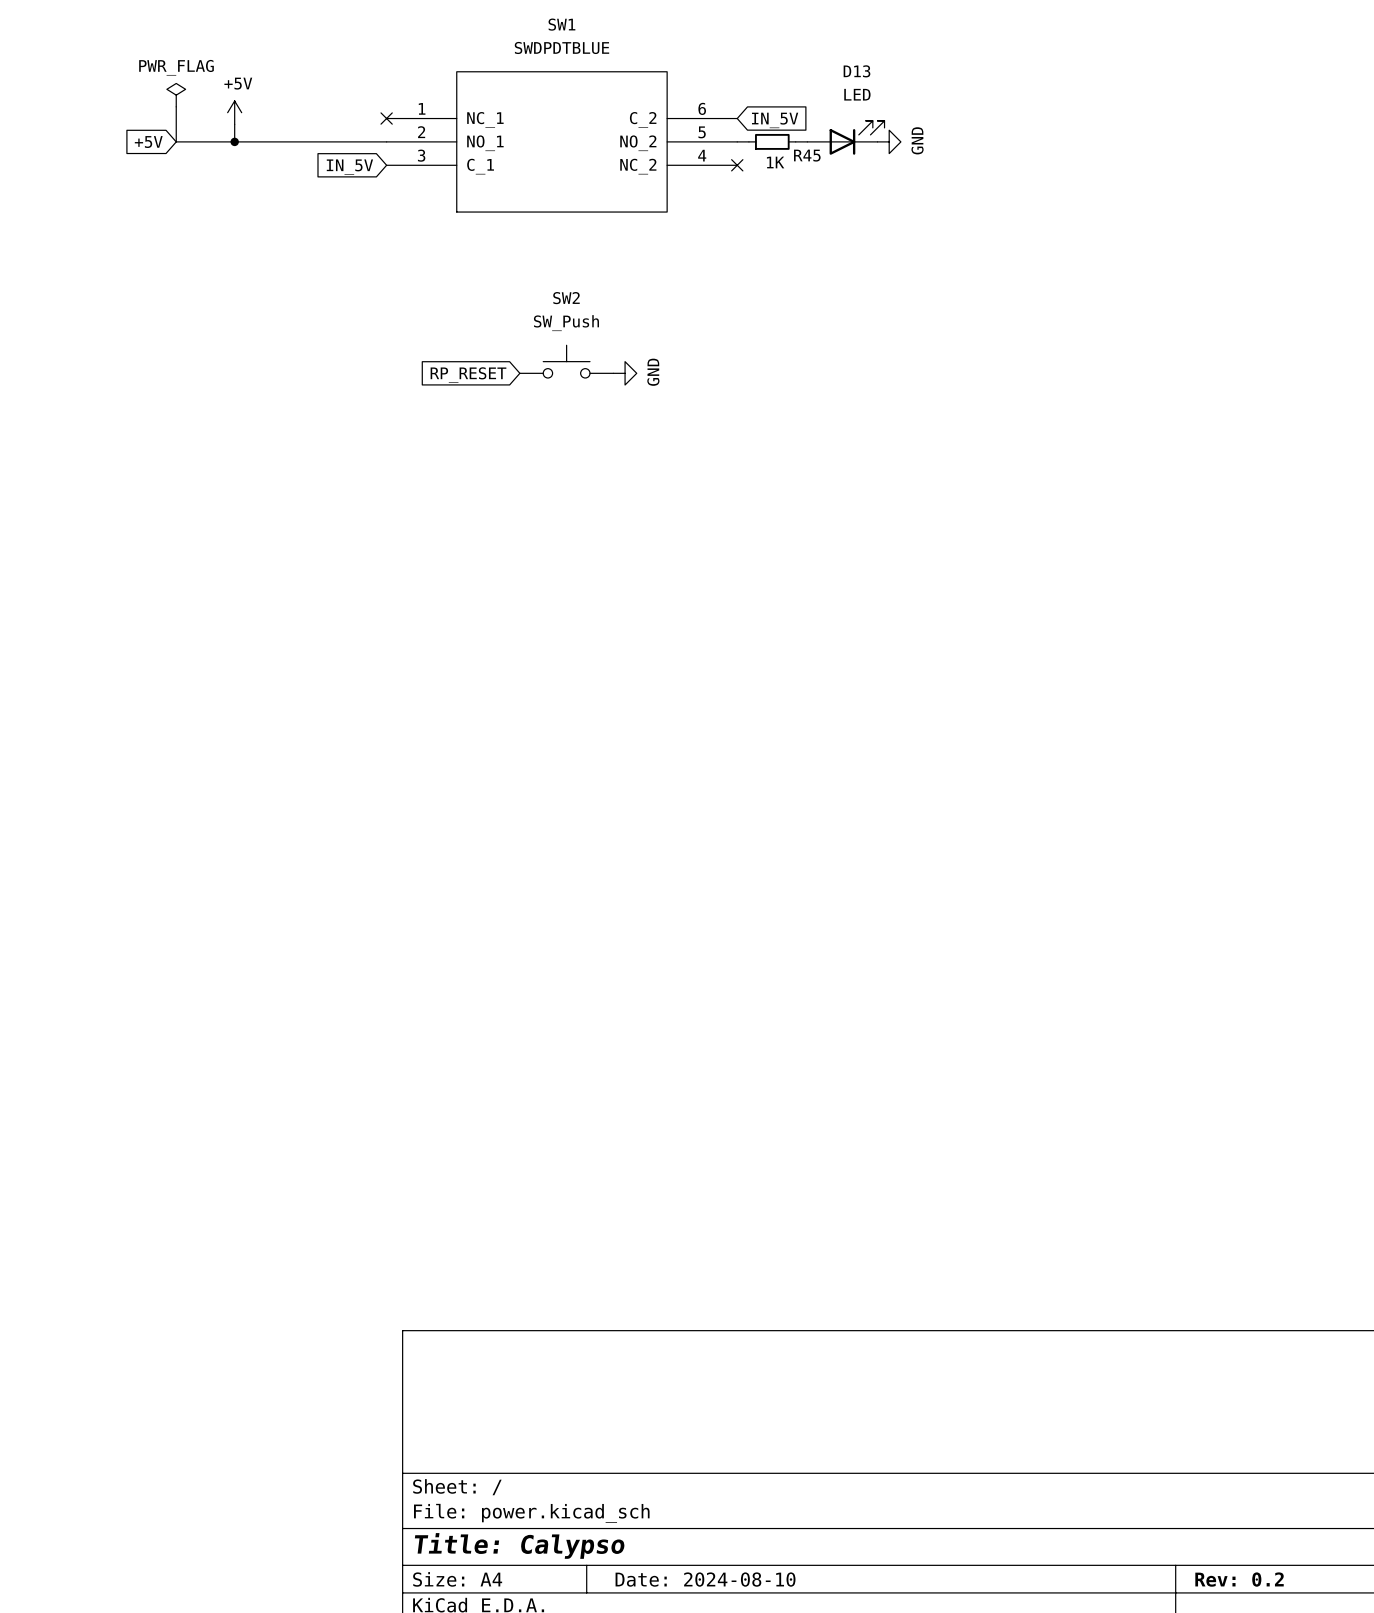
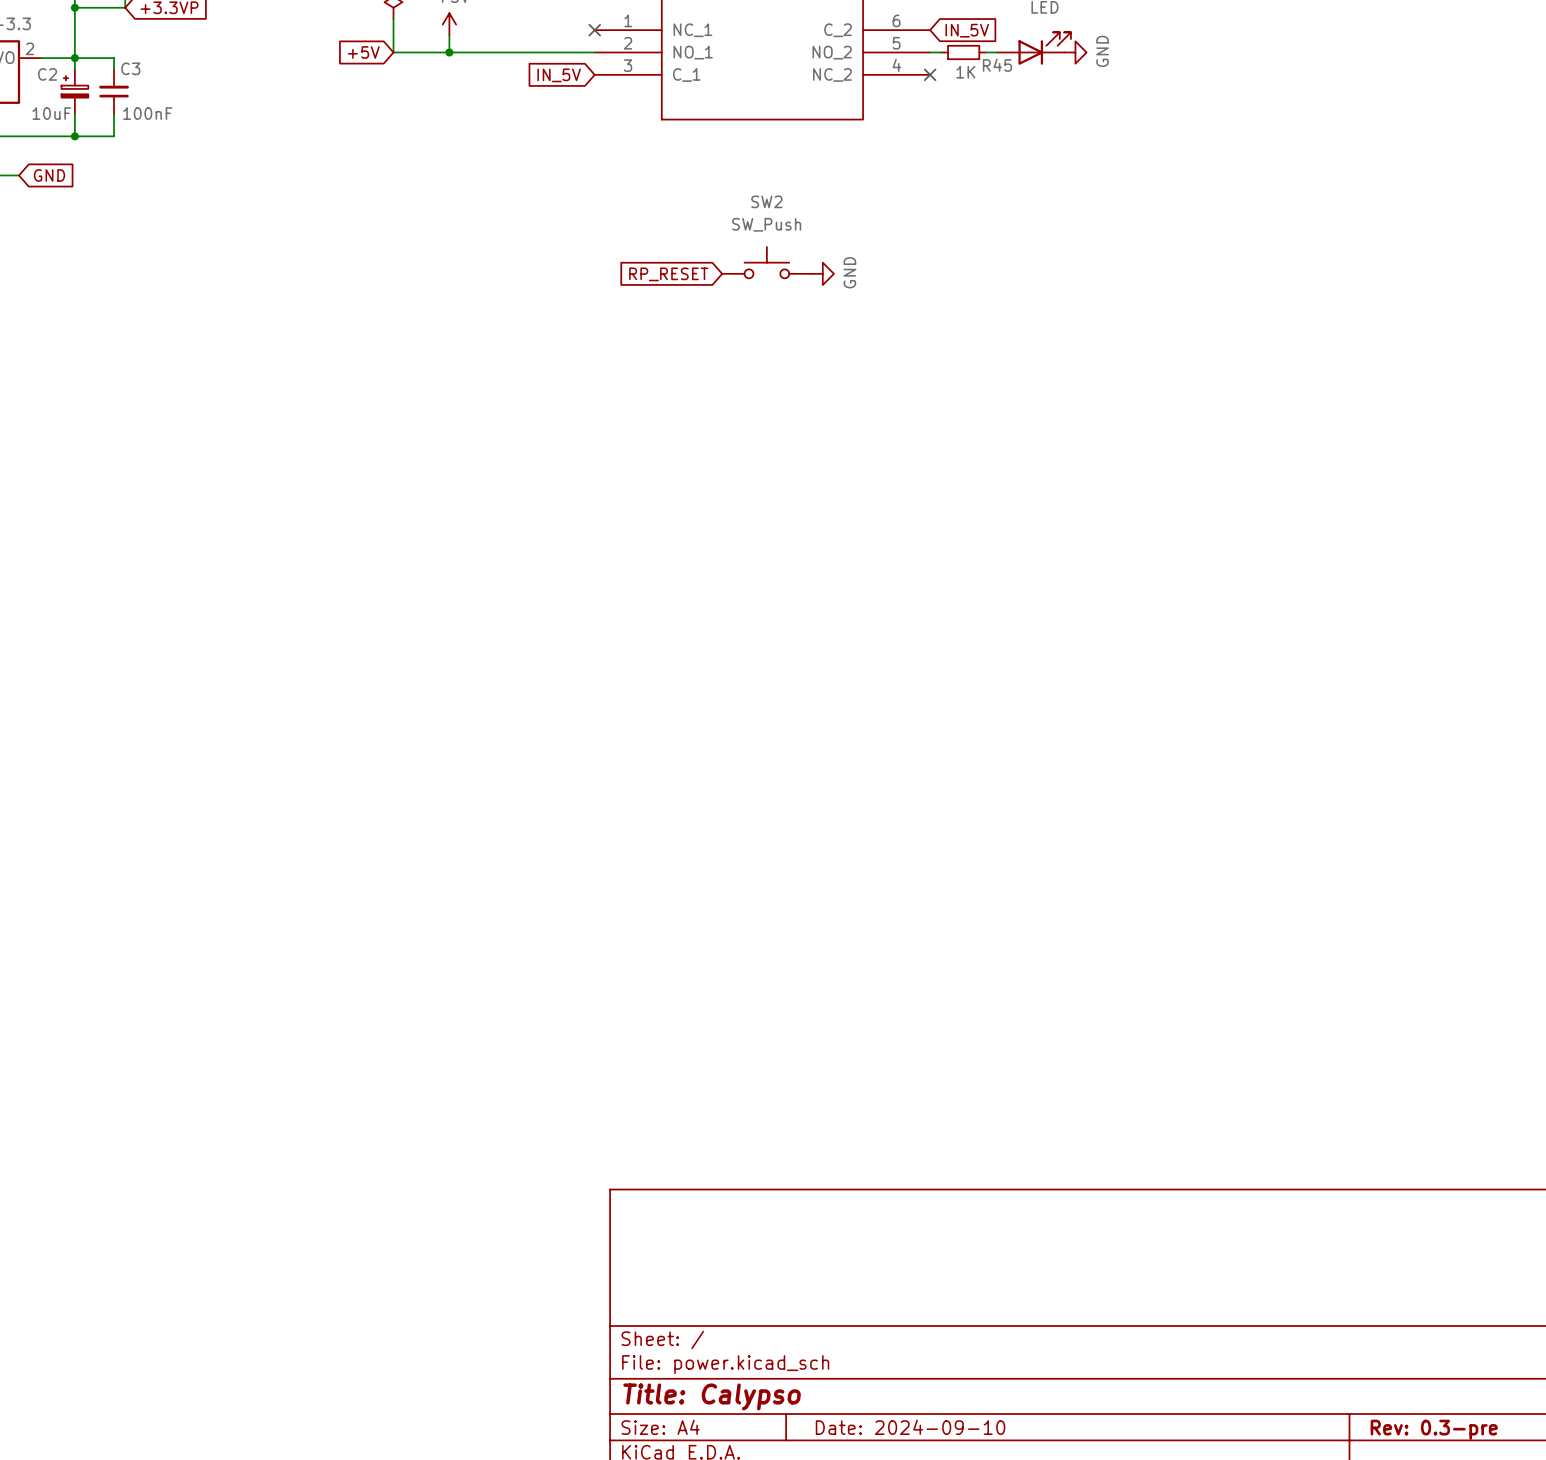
title block: Date: 2024-08-10 (705, 1579) -> Date: 2024-09-10 (910, 1427)
title block: Rev: 0.2 (1239, 1579) -> Rev: 0.3-pre (1434, 1429)

